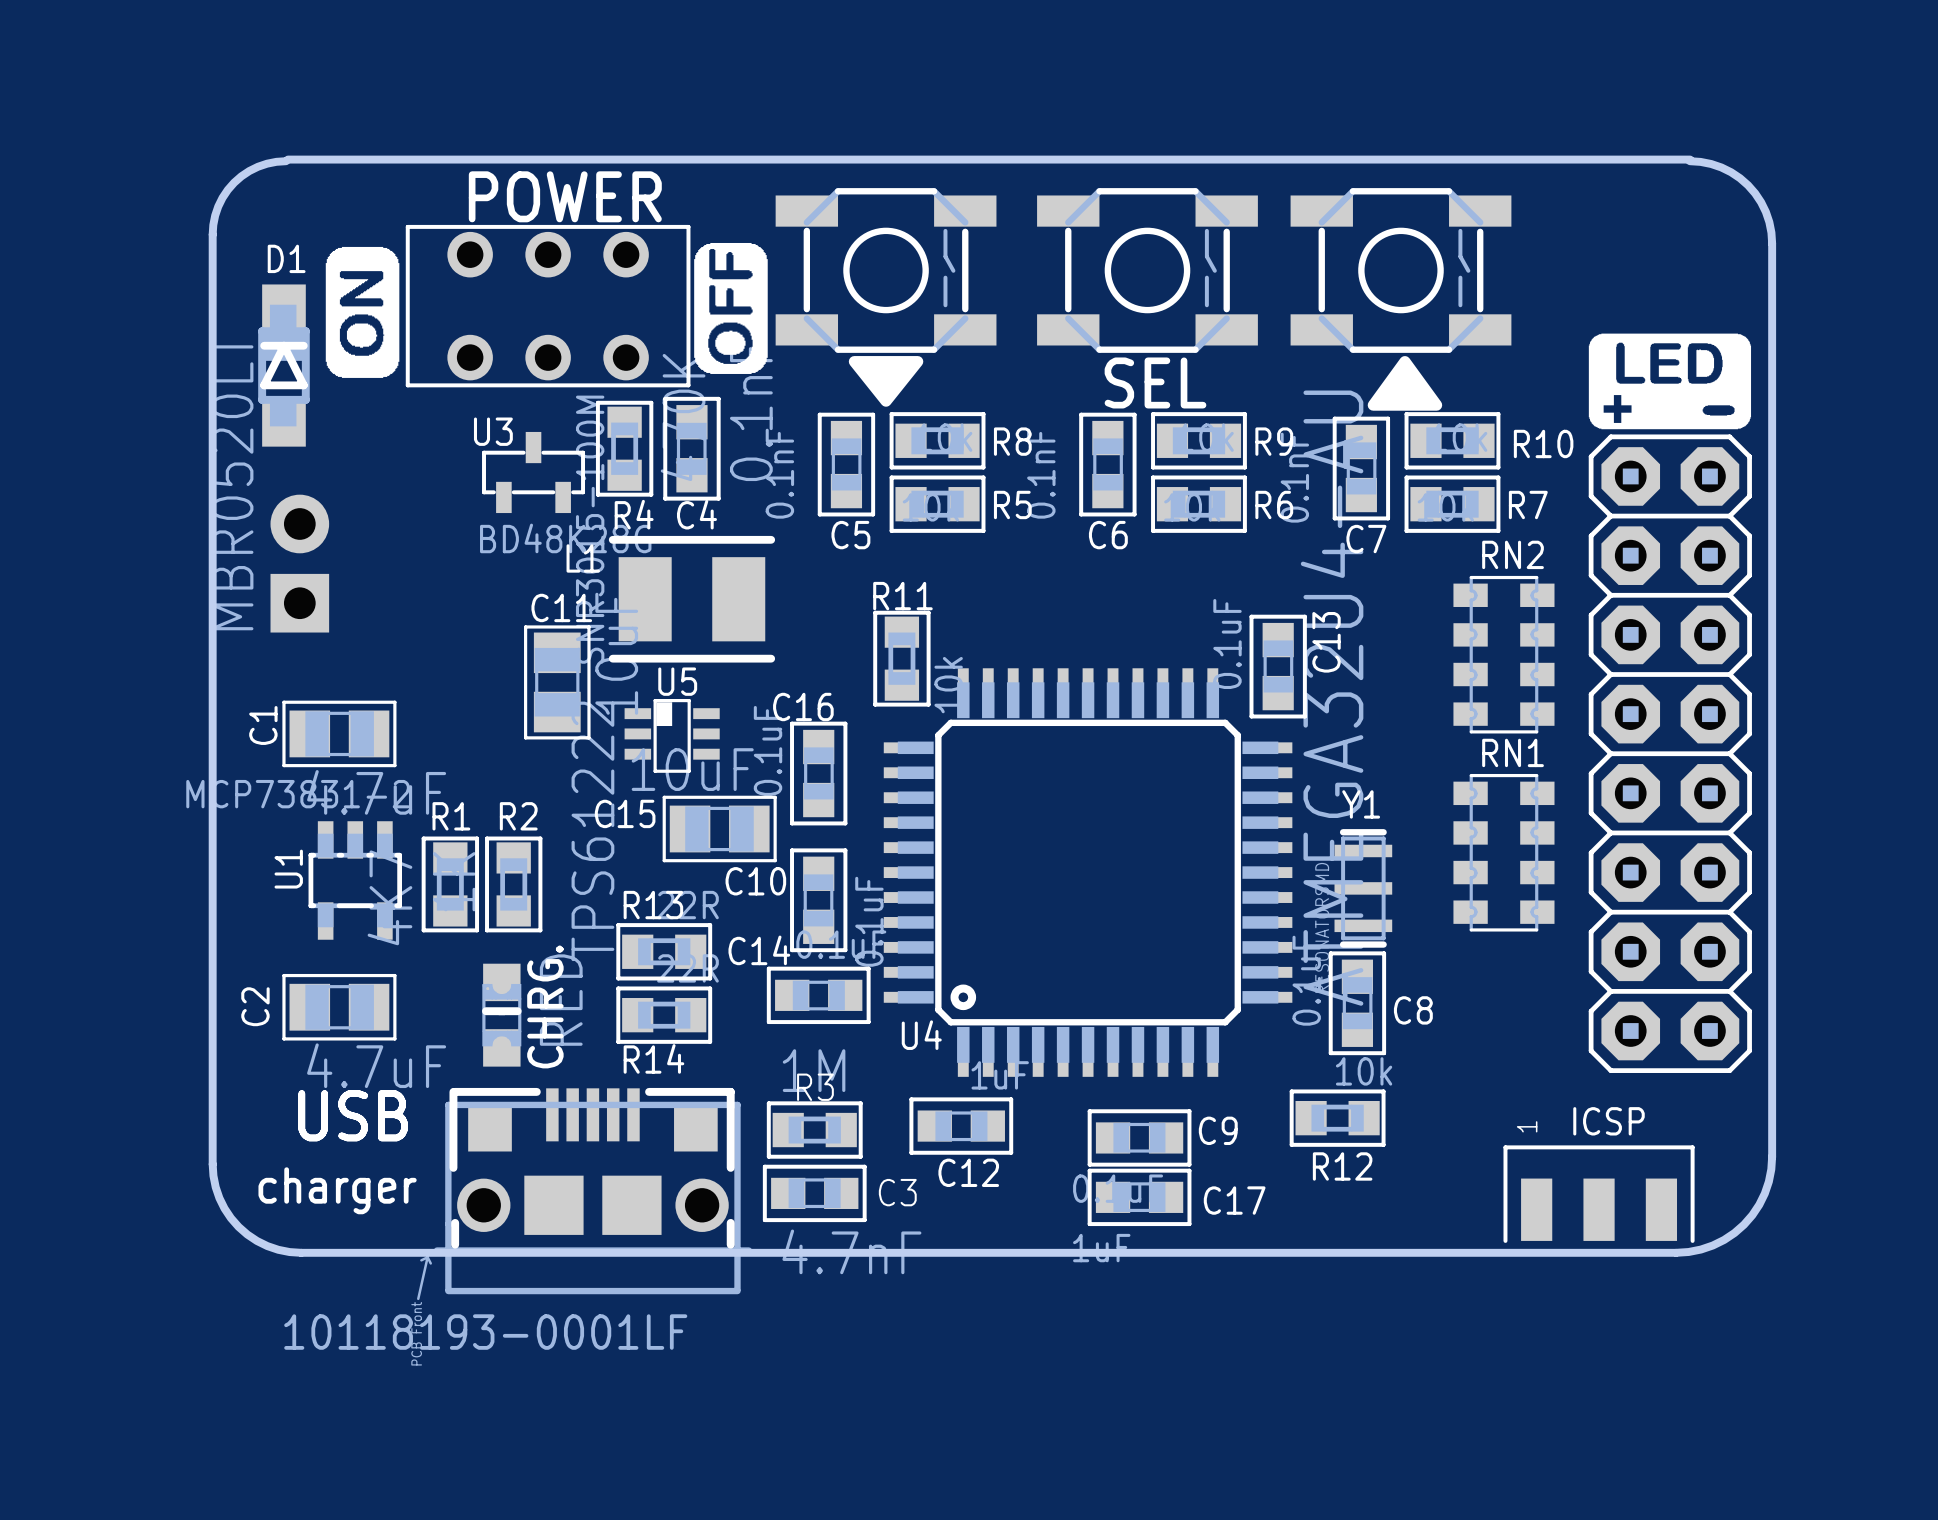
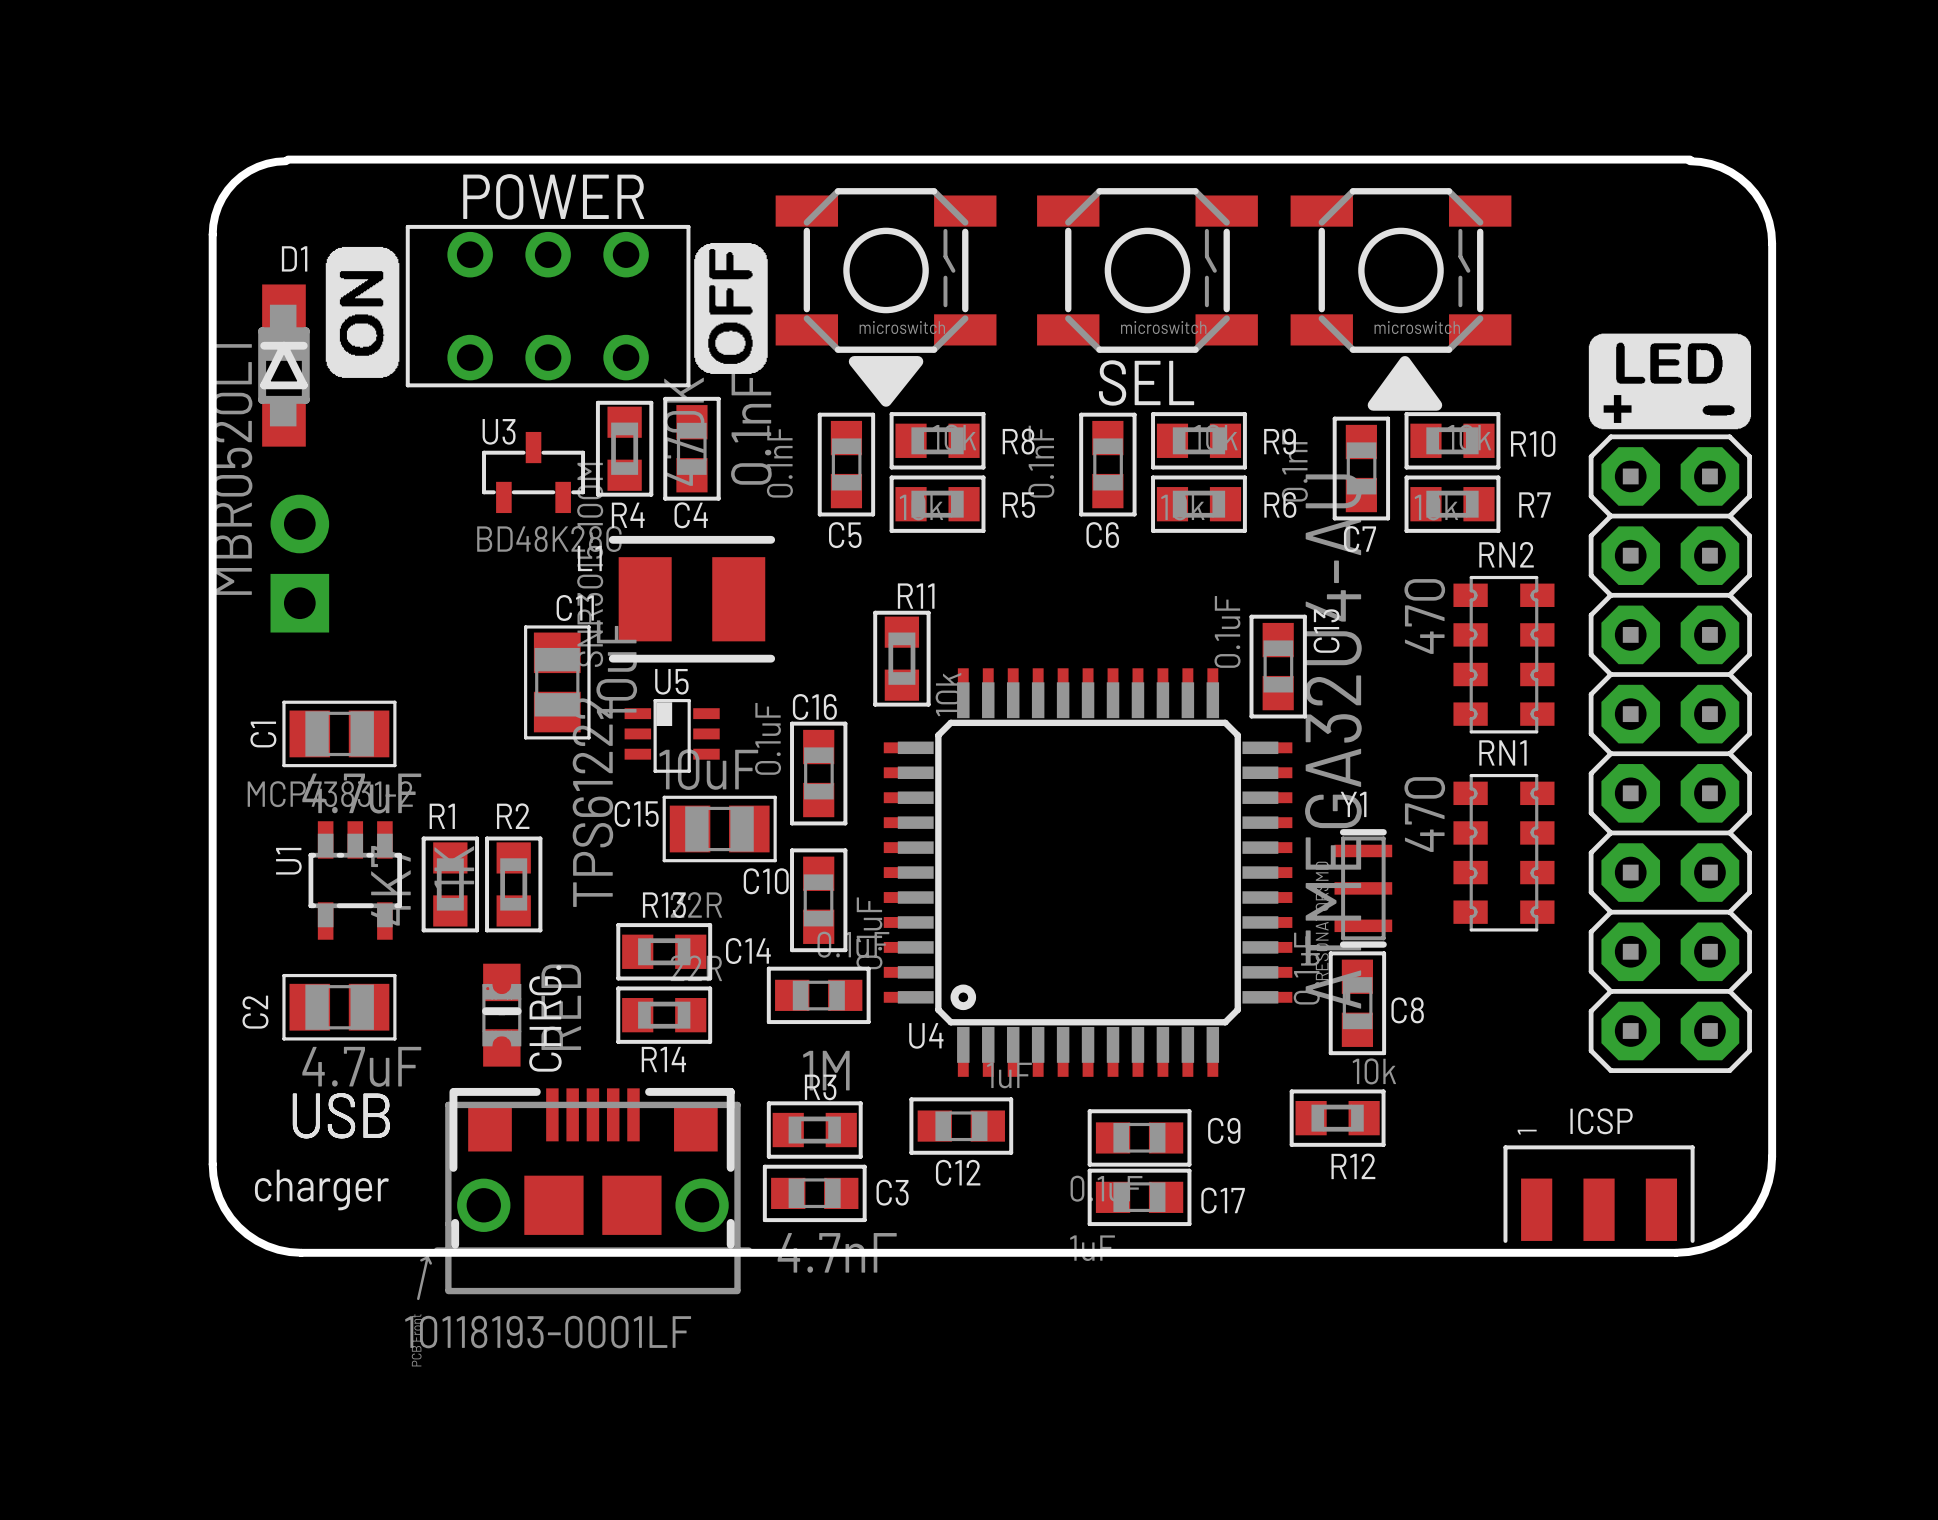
part value: none -> microswitch (902, 327)
part value: none -> microswitch (1163, 327)
part value: none -> microswitch (1417, 327)
RN2 value: none -> 470 (1424, 616)
RN1 value: none -> 470 (1424, 814)

